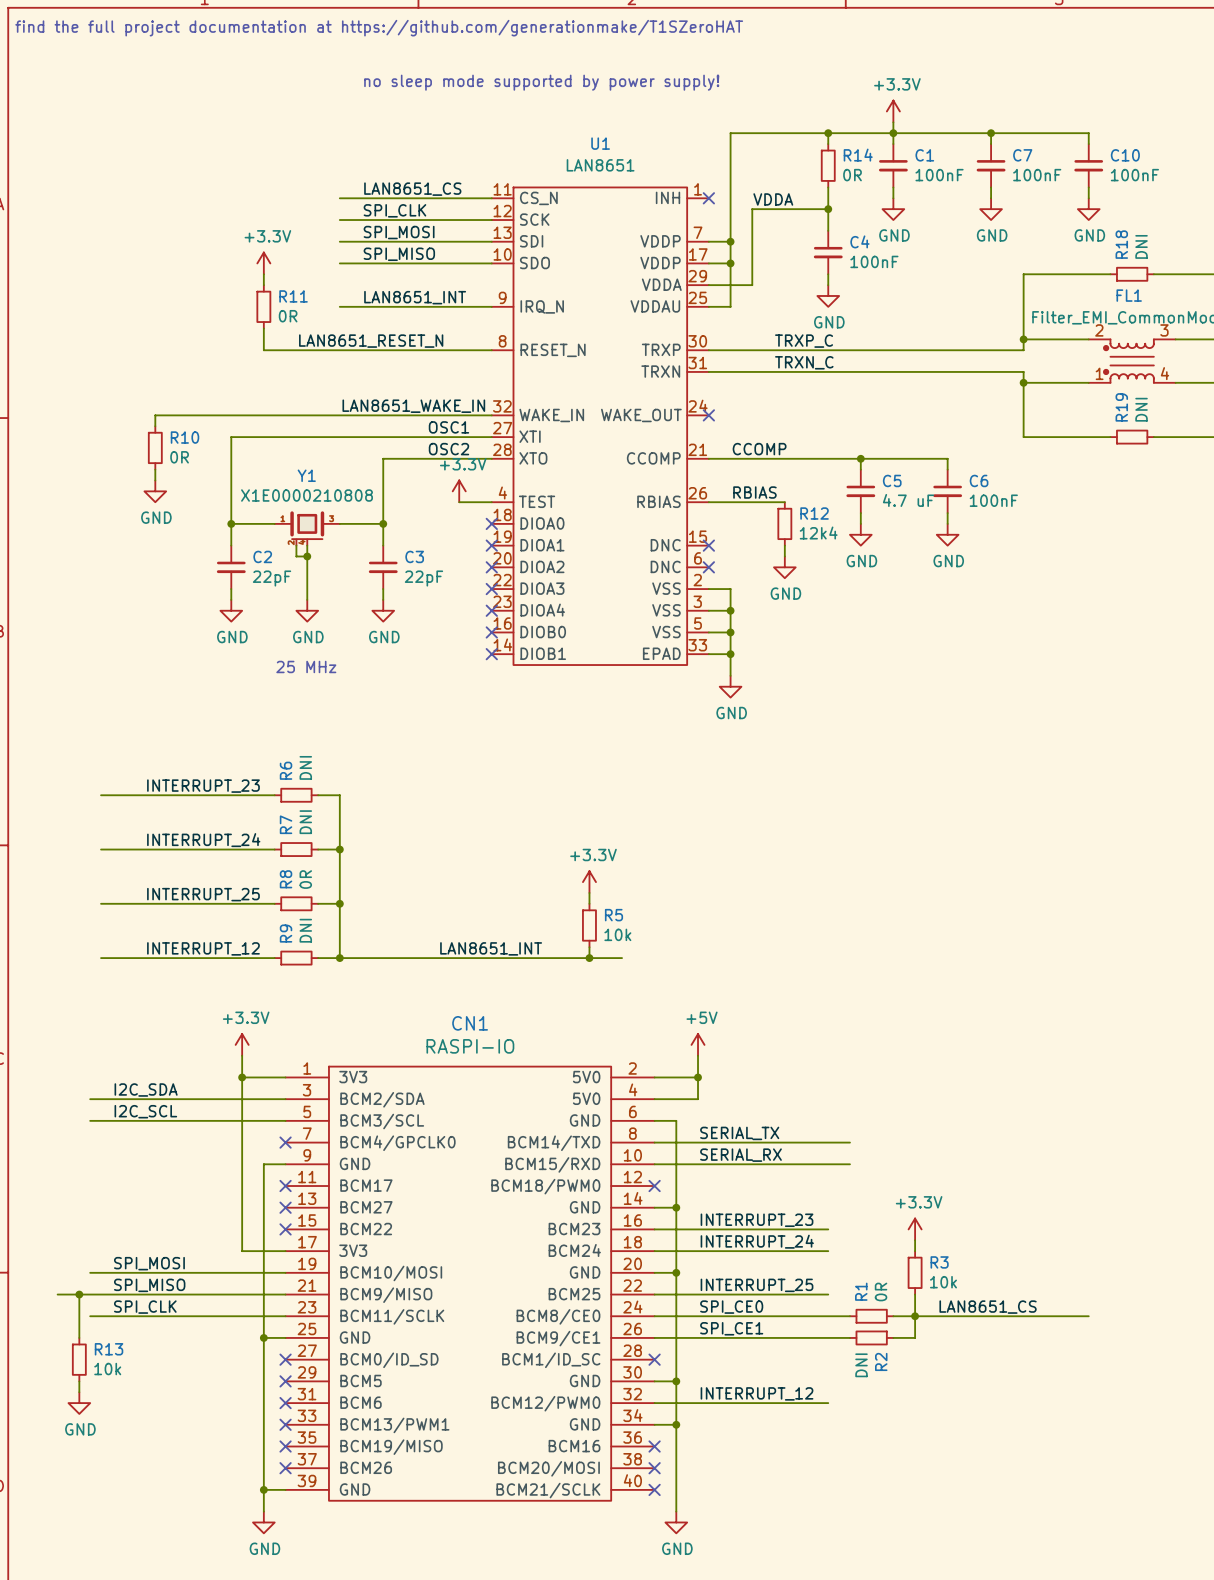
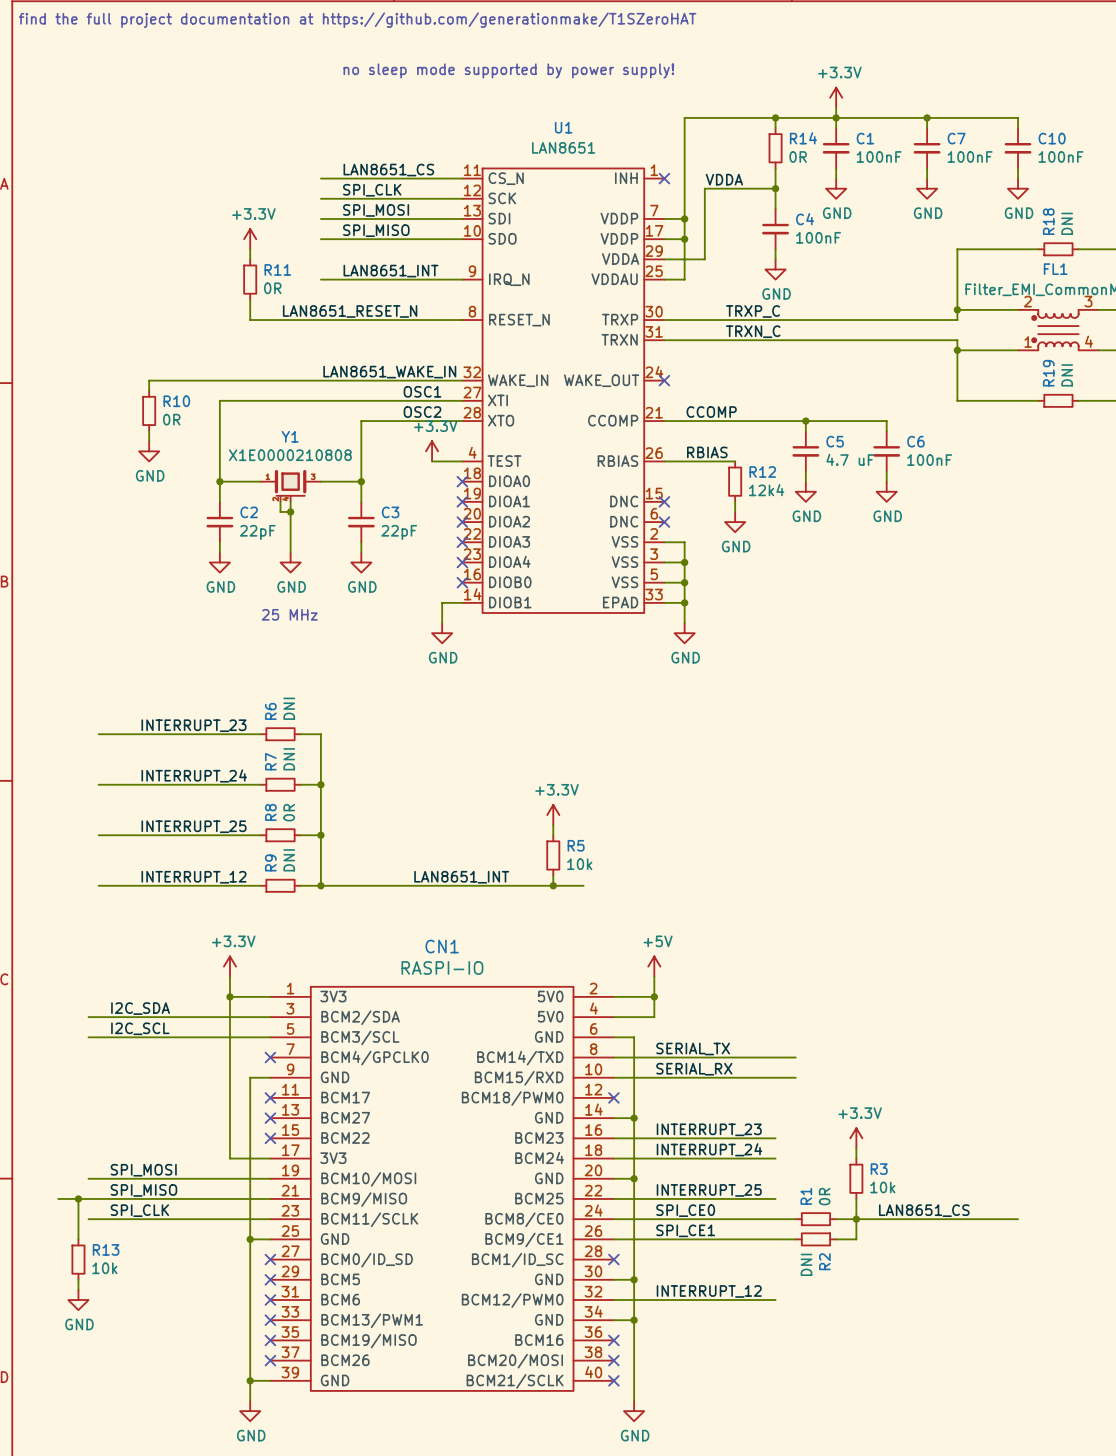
wire: none -> (462, 602) (442, 602) (442, 623)
no-connect mark: (491, 654) -> none
power symbol: none -> GND (442, 633)

